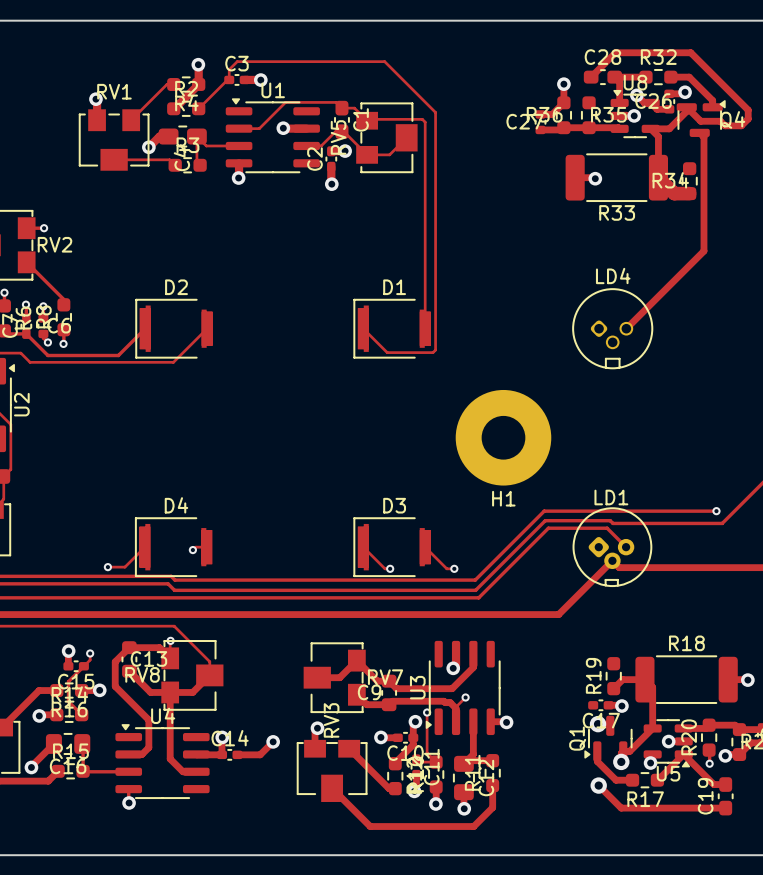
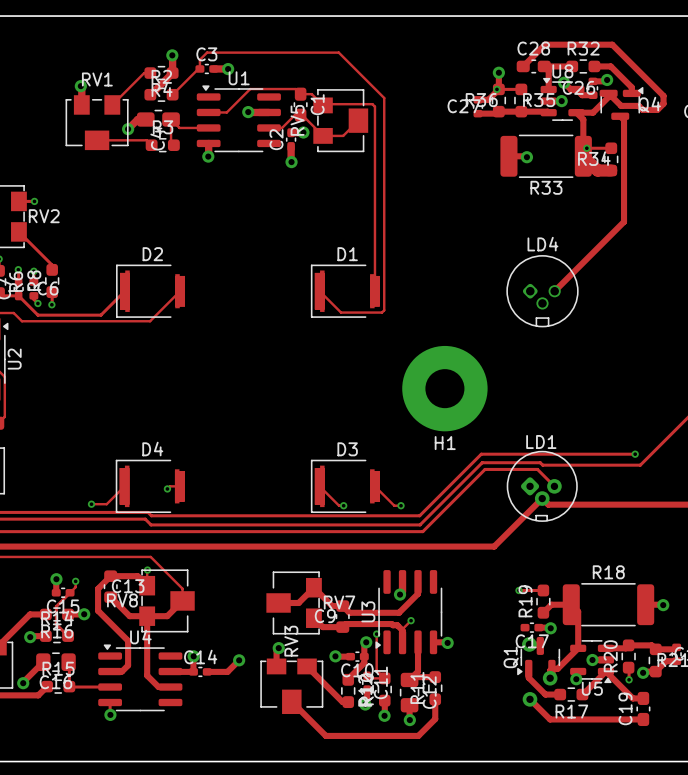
track: none -> (496, 89) (521, 89)
via: none -> (496, 89)
track: none -> (586, 148) (611, 148)
via: none -> (586, 148)
track: none -> (519, 590) (543, 590)
via: none -> (519, 590)

